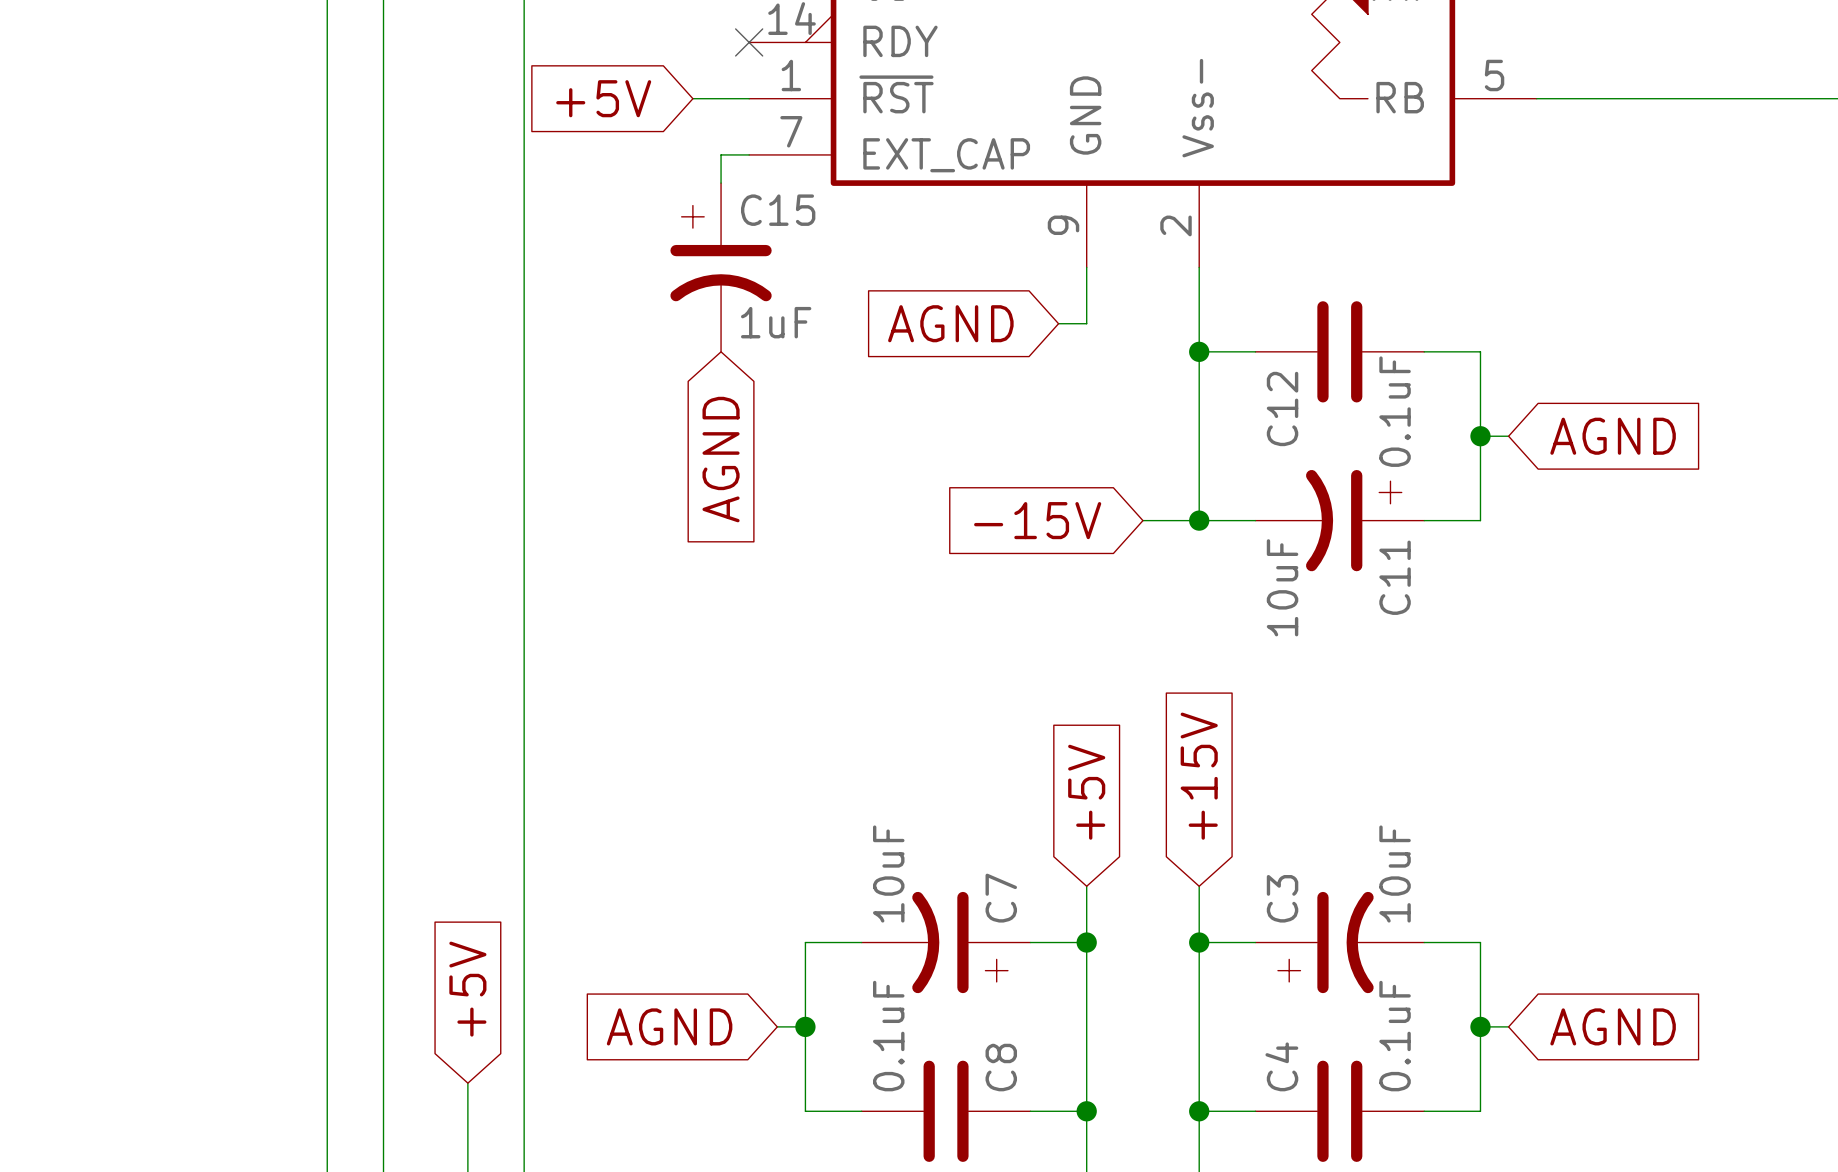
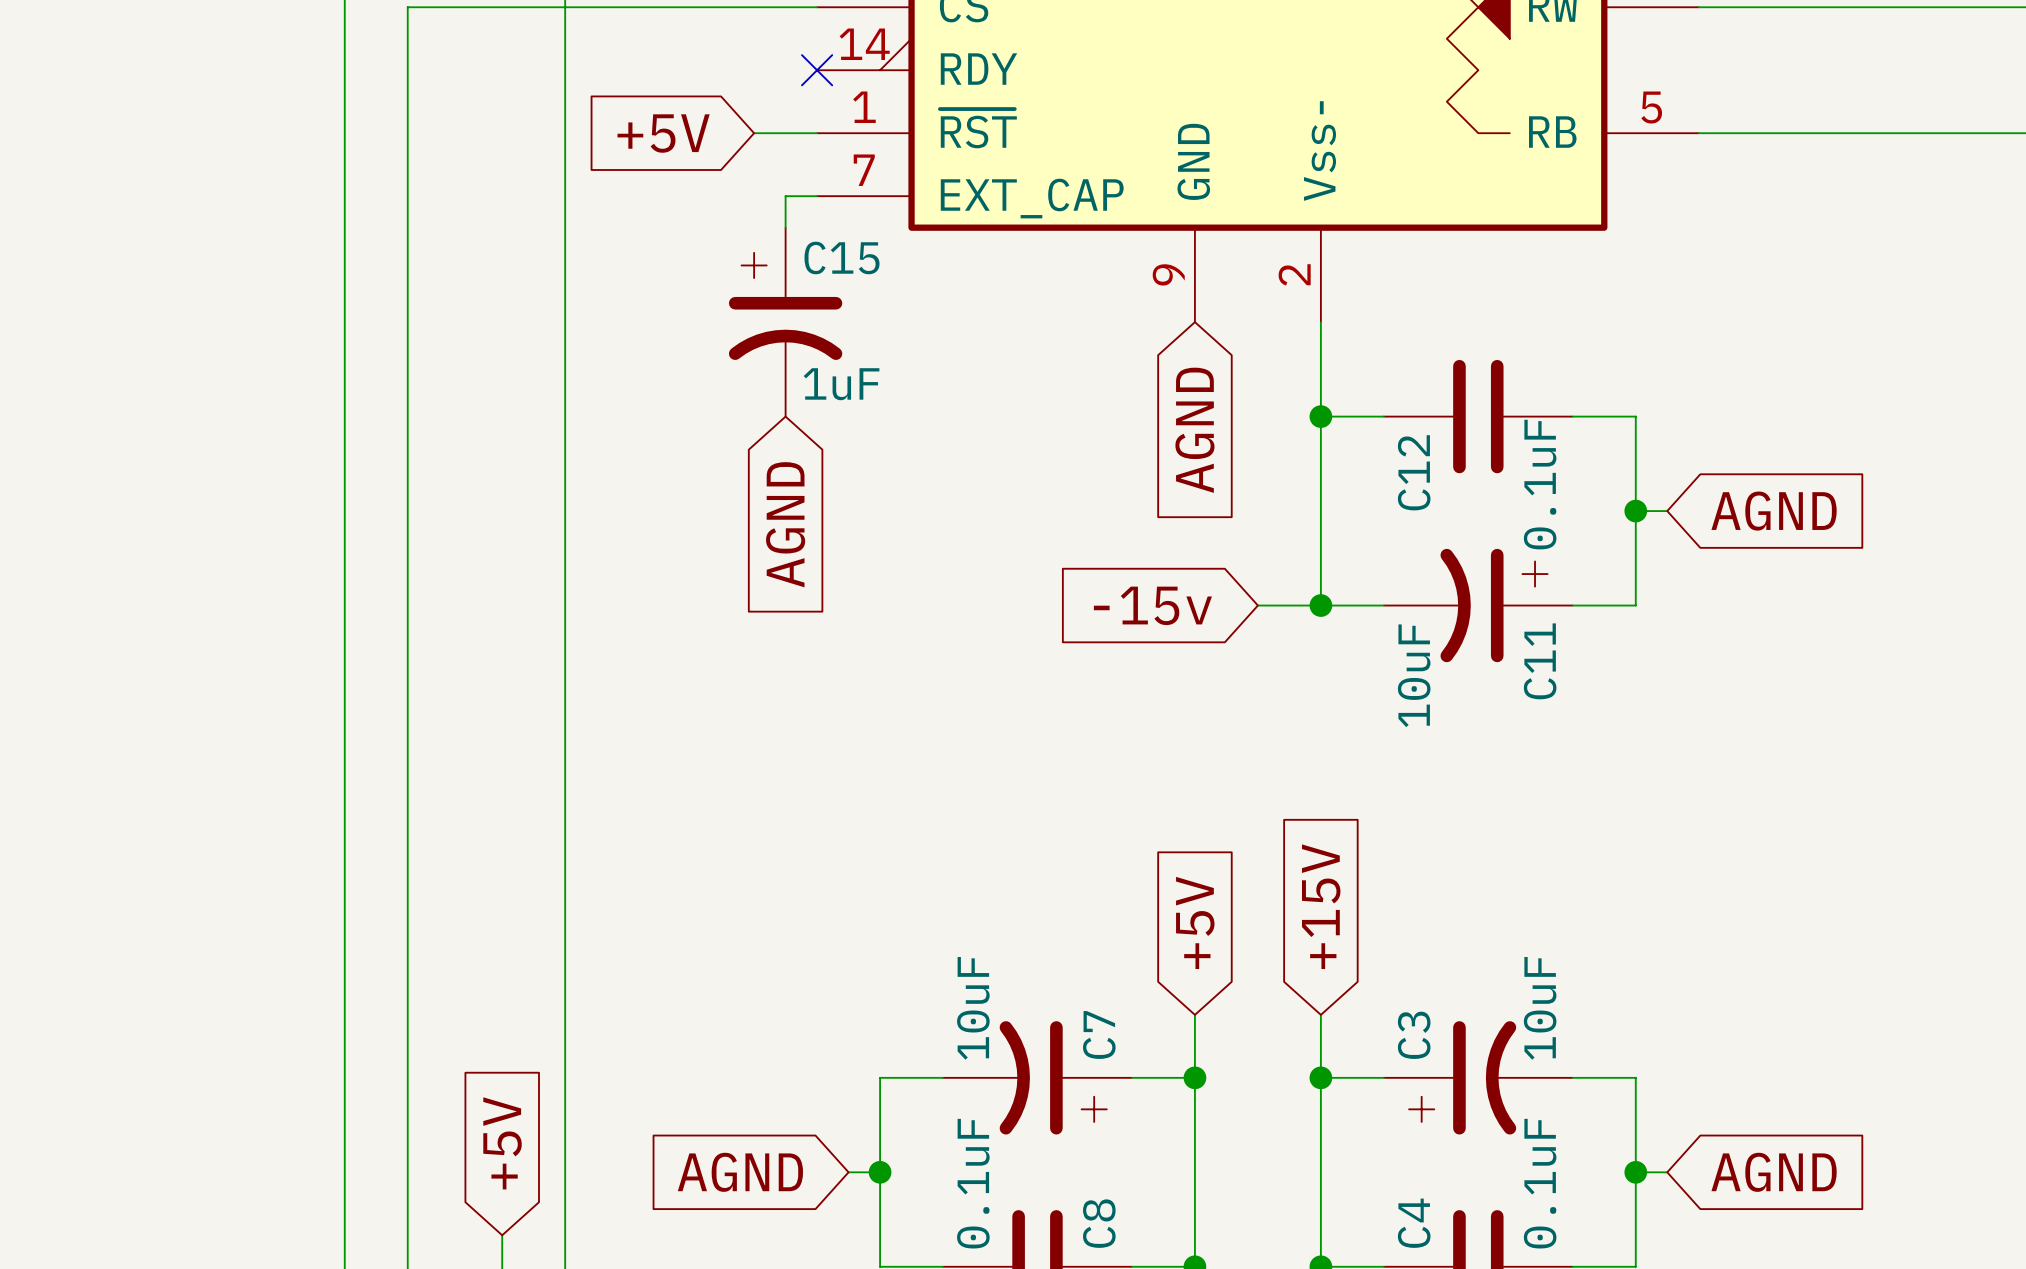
wire: (1086, 267) (1086, 323) (1058, 323) -> none
global label rotation: 0° (950, 323) -> 90° counterclockwise (1194, 430)
global label: -15V (1037, 520) -> -15v (1152, 605)

